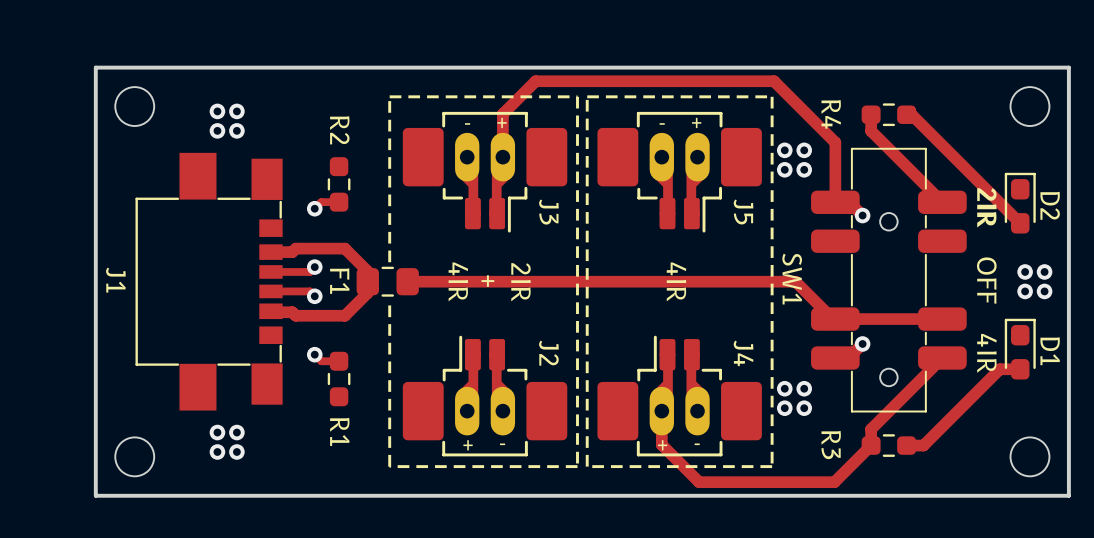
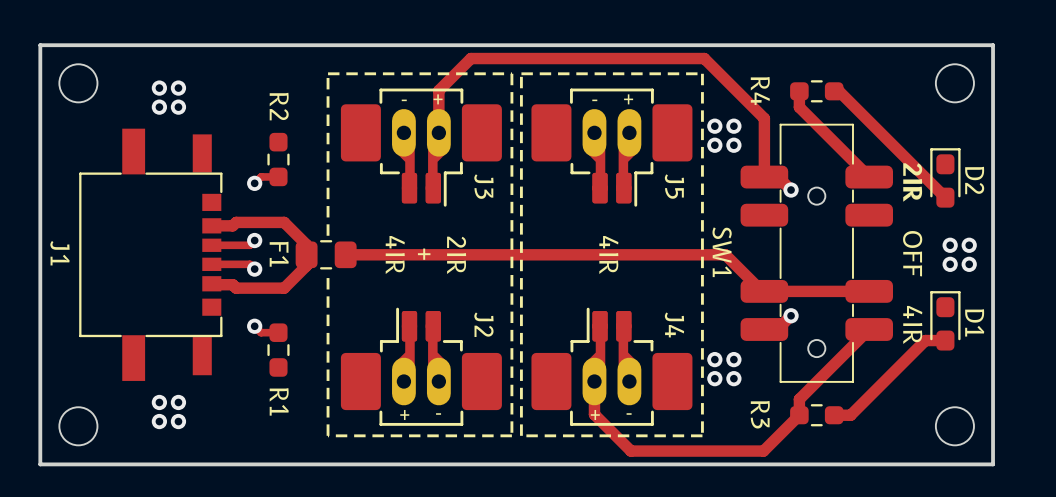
J1 footprint: [135, 152, 283, 411] -> [79, 128, 223, 381]

